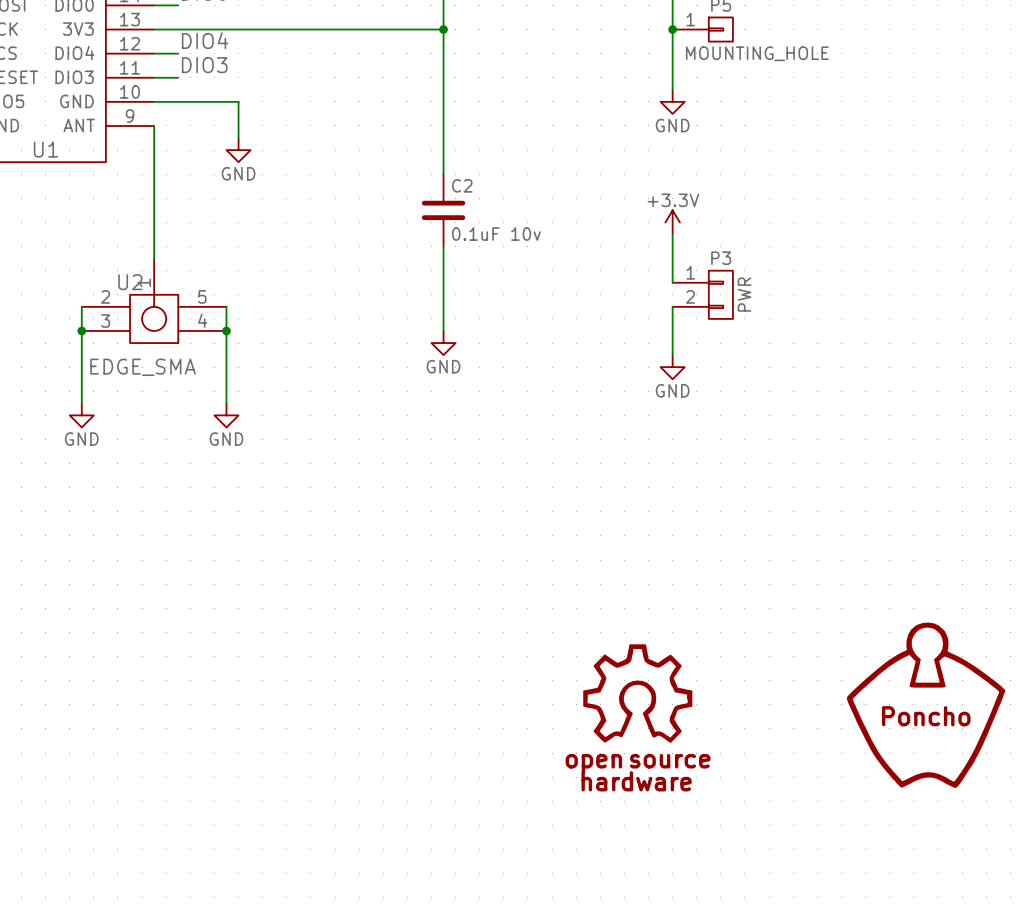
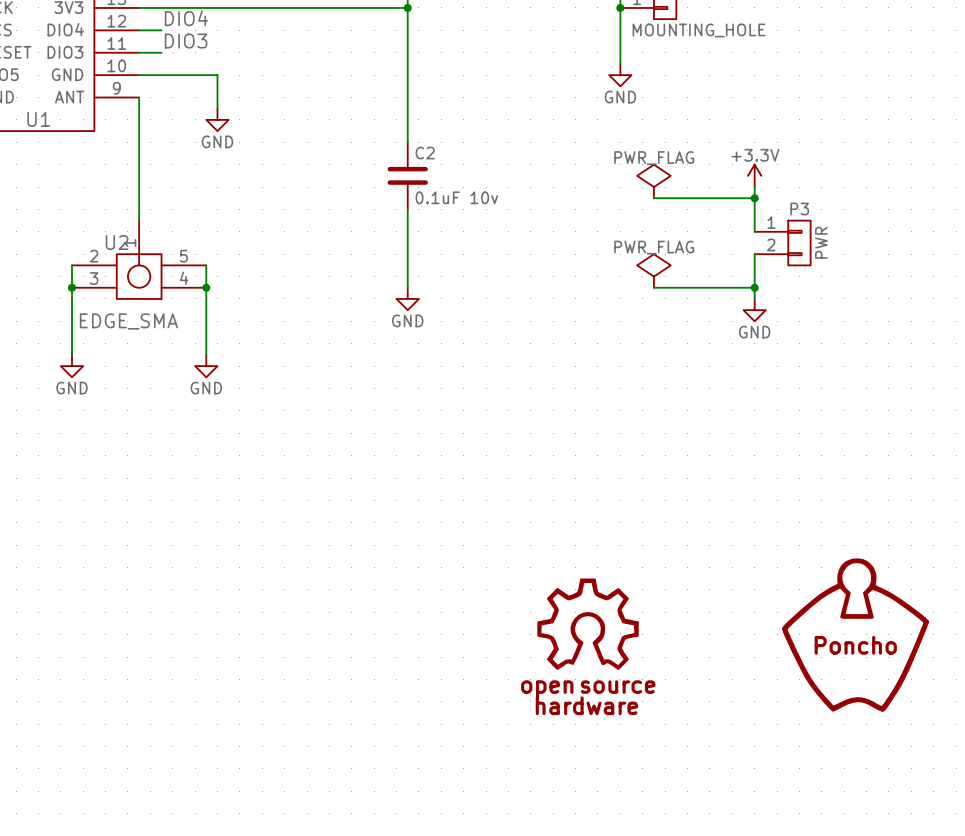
power symbol: none -> PWR_FLAG (653, 181)
power symbol position: +3.3V (672, 222) -> +3.3V (754, 175)
wire: (672, 234) (672, 282) -> (754, 187) (754, 231)
wire: none -> (653, 198) (754, 198)
junction: none -> (754, 198)
P3 position: (702, 294) -> (782, 243)
wire: (672, 306) (672, 355) -> (754, 254) (754, 298)
power symbol: none -> PWR_FLAG (653, 270)
wire: none -> (653, 287) (754, 287)
junction: none -> (754, 287)
power symbol position: GND (672, 367) -> GND (754, 310)

